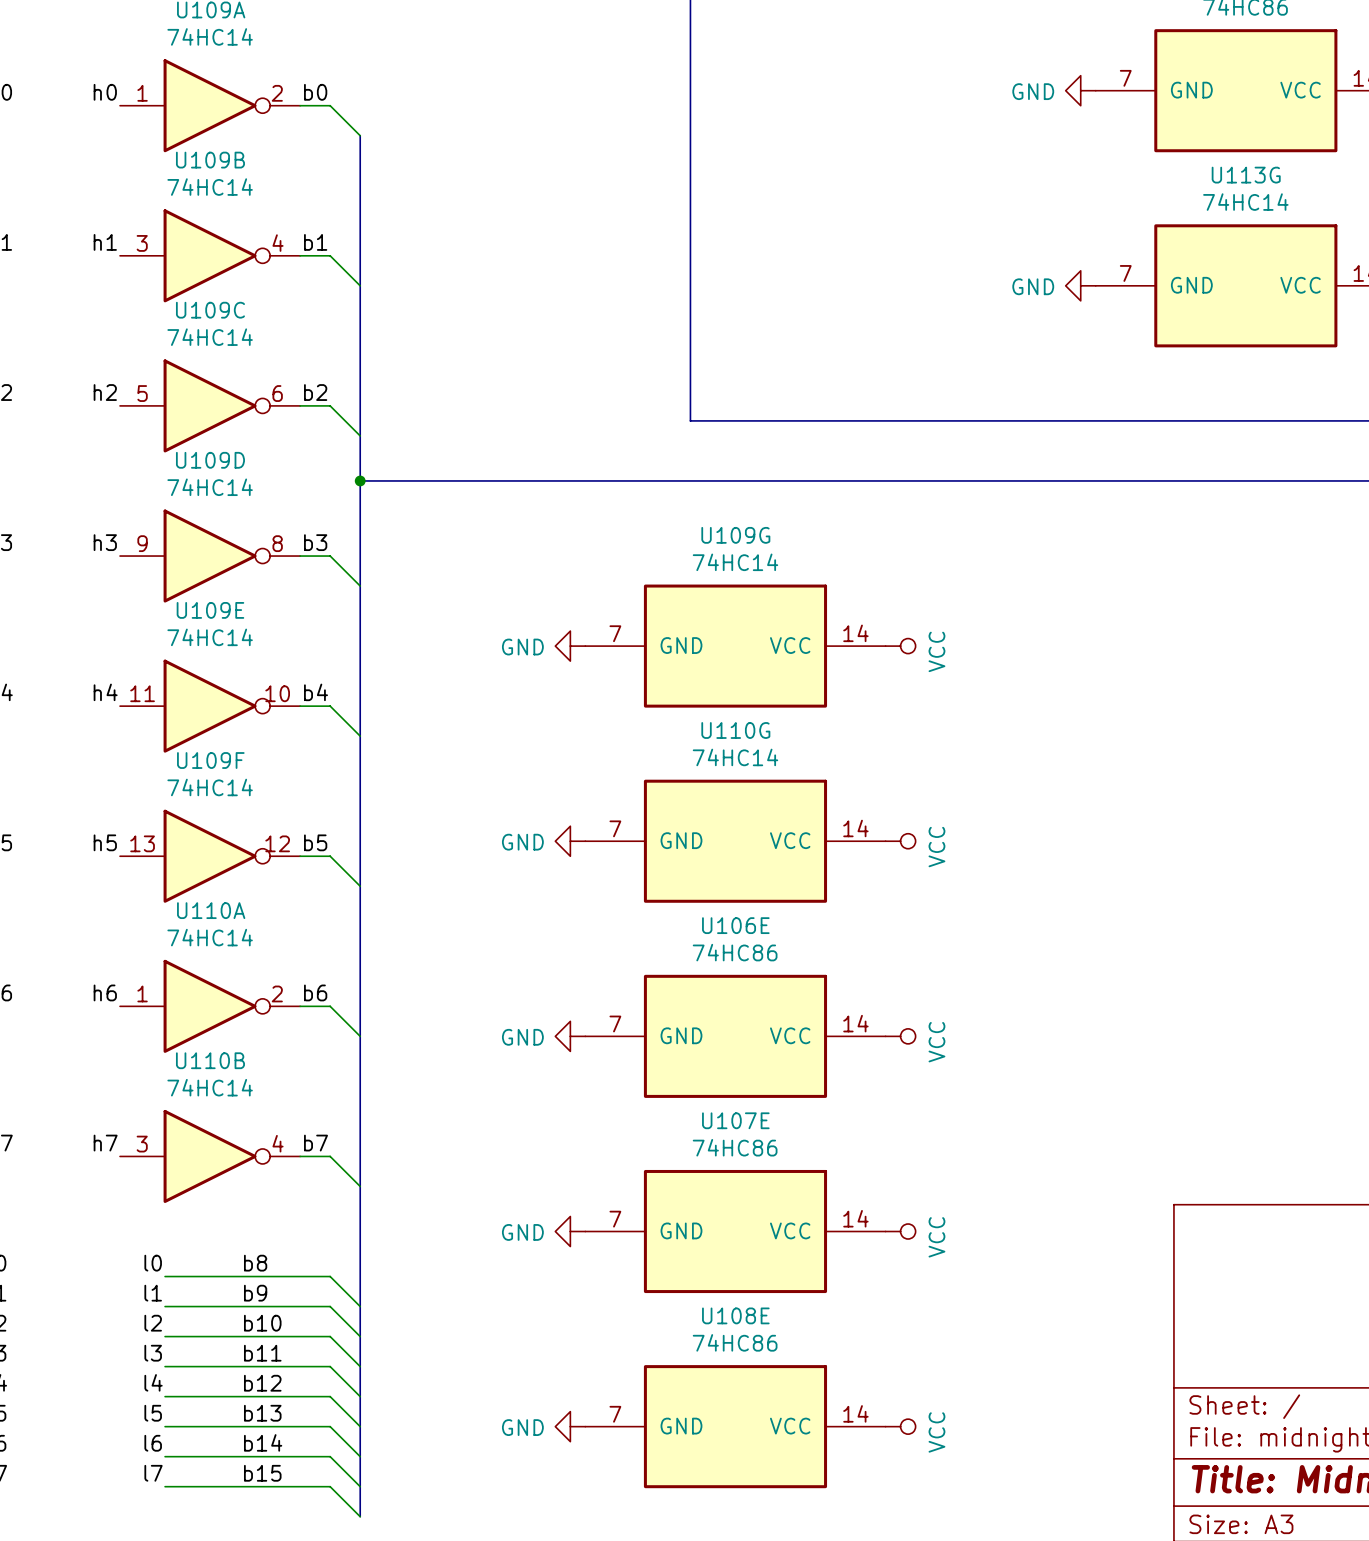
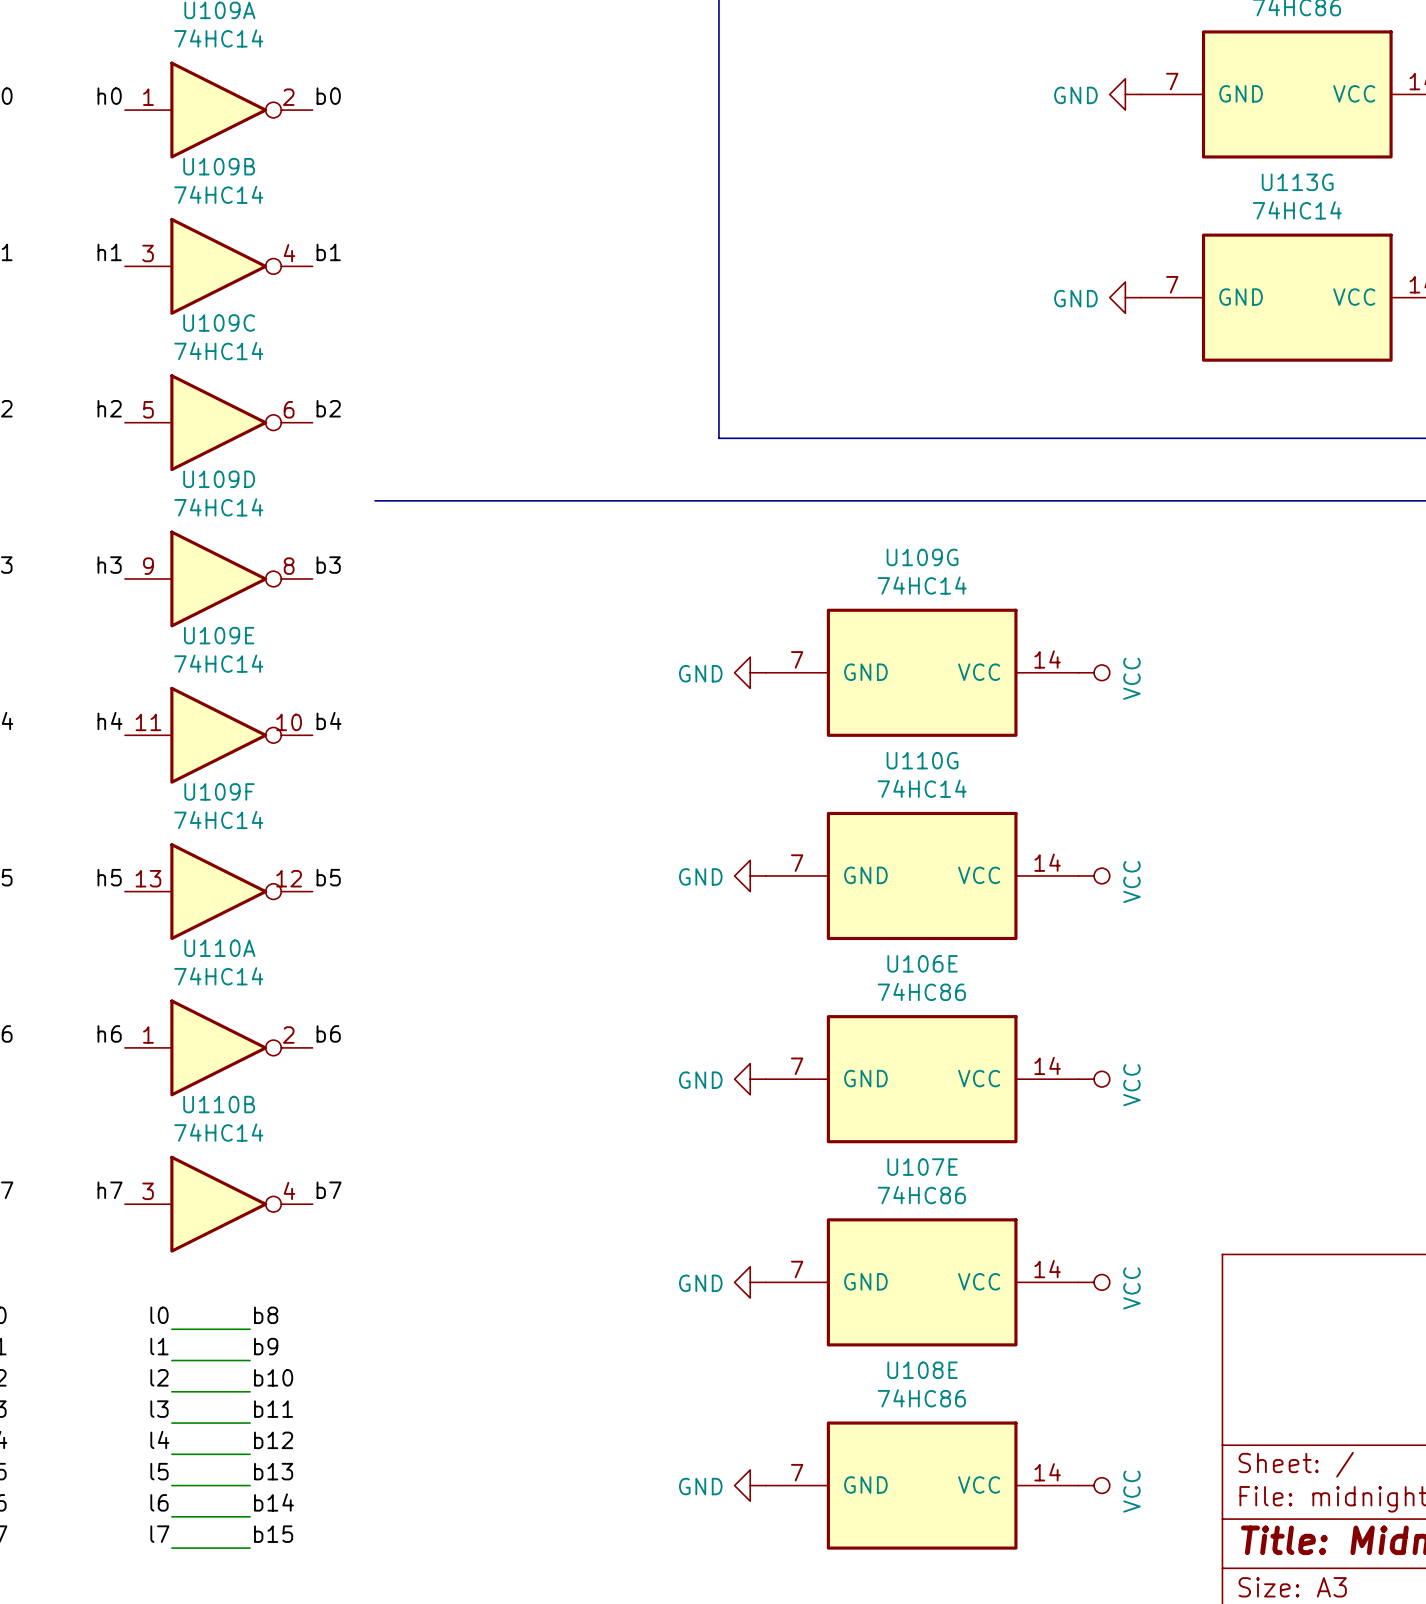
wire: (300, 105) (330, 105) (360, 135) -> none
bus: (360, 135) (360, 1516) -> none
wire: (300, 255) (330, 255) (360, 285) -> none
wire: (300, 405) (330, 405) (360, 435) -> none
junction: (360, 480) -> none
wire: (300, 556) (330, 556) (360, 586) -> none
power symbol: GND (570, 646) -> none
power symbol: none -> GND (750, 672)
U109G position: (735, 646) -> (922, 672)
power symbol: VCC (900, 646) -> none
power symbol: none -> VCC (1094, 672)
wire: (300, 706) (330, 706) (360, 736) -> none
power symbol: GND (570, 841) -> none
power symbol: none -> GND (750, 875)
U110G position: (735, 841) -> (922, 875)
power symbol: VCC (900, 841) -> none
power symbol: none -> VCC (1094, 875)
wire: (300, 856) (330, 856) (360, 886) -> none
wire: (300, 1006) (330, 1006) (360, 1036) -> none
power symbol: GND (570, 1036) -> none
power symbol: none -> GND (750, 1079)
U106E position: (735, 1036) -> (922, 1079)
power symbol: VCC (900, 1036) -> none
power symbol: none -> VCC (1094, 1079)
wire: (300, 1156) (330, 1156) (360, 1186) -> none
power symbol: GND (570, 1231) -> none
power symbol: none -> GND (750, 1282)
U107E position: (735, 1231) -> (922, 1282)
power symbol: VCC (900, 1231) -> none
power symbol: none -> VCC (1094, 1282)
wire: (240, 1276) (330, 1276) (360, 1306) -> none
wire: (240, 1306) (330, 1306) (360, 1336) -> none
wire: (240, 1336) (330, 1336) (360, 1366) -> none
wire: (240, 1366) (330, 1366) (360, 1396) -> none
wire: (240, 1396) (330, 1396) (360, 1426) -> none
wire: (240, 1426) (330, 1426) (360, 1456) -> none
power symbol: GND (570, 1426) -> none
power symbol: none -> GND (750, 1485)
U108E position: (735, 1426) -> (922, 1485)
power symbol: VCC (900, 1426) -> none
power symbol: none -> VCC (1094, 1485)
wire: (240, 1456) (330, 1456) (360, 1486) -> none
wire: (240, 1486) (330, 1486) (360, 1516) -> none

